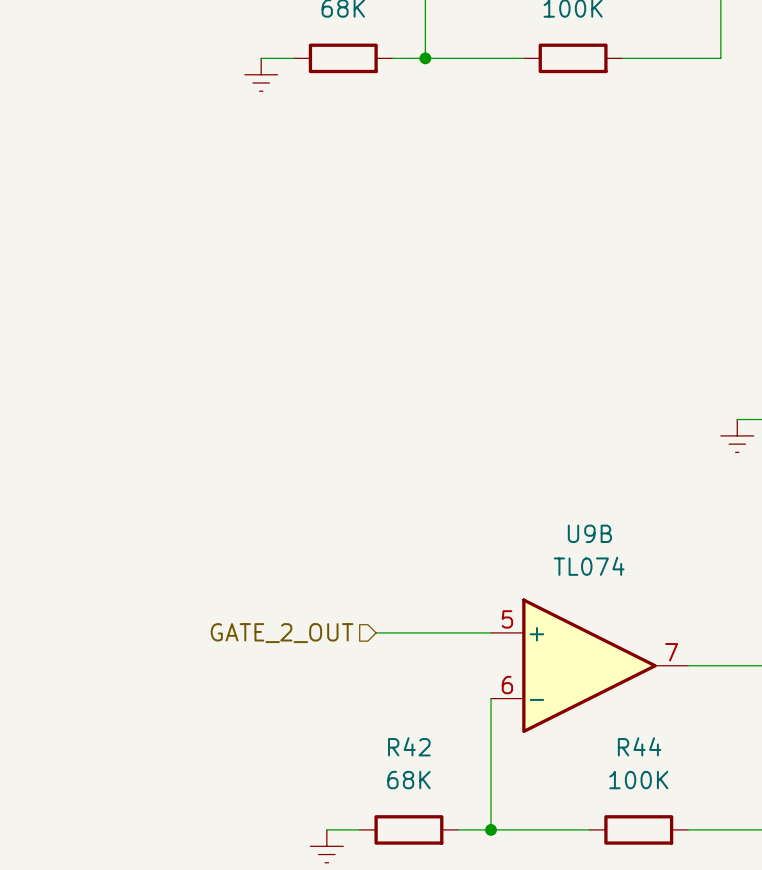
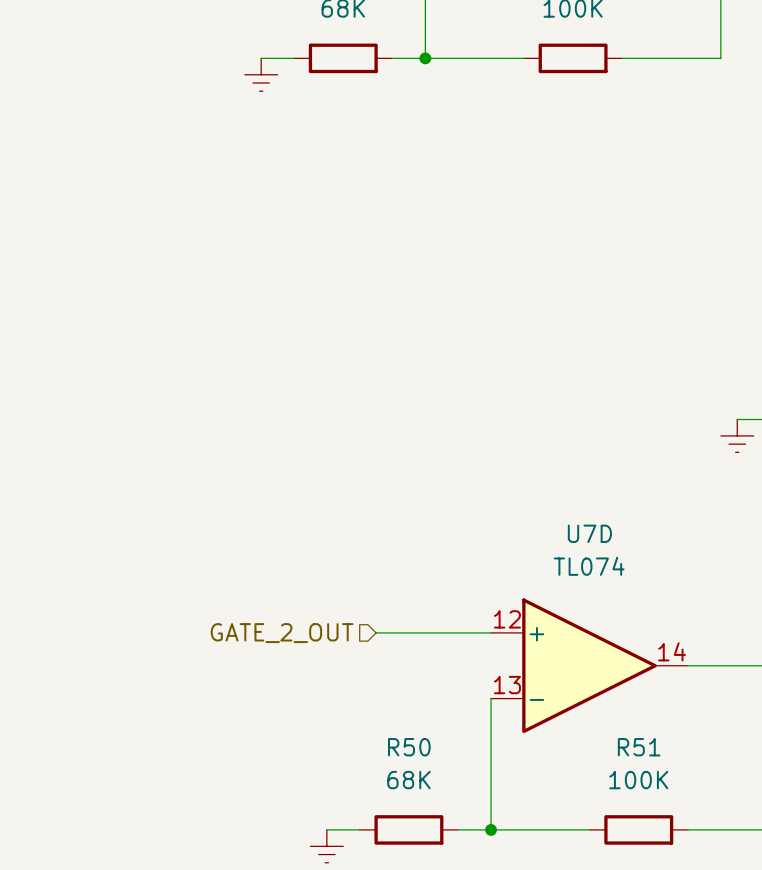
U9B name: U9B (589, 533) -> U7D (589, 533)
U9B pin number: 5 (507, 619) -> 12 (507, 619)
U9B pin number: 7 (671, 652) -> 14 (671, 651)
U9B pin number: 6 (507, 685) -> 13 (507, 685)
R42 name: R42 (409, 746) -> R50 (409, 747)
R44 name: R44 (639, 746) -> R51 (639, 747)

